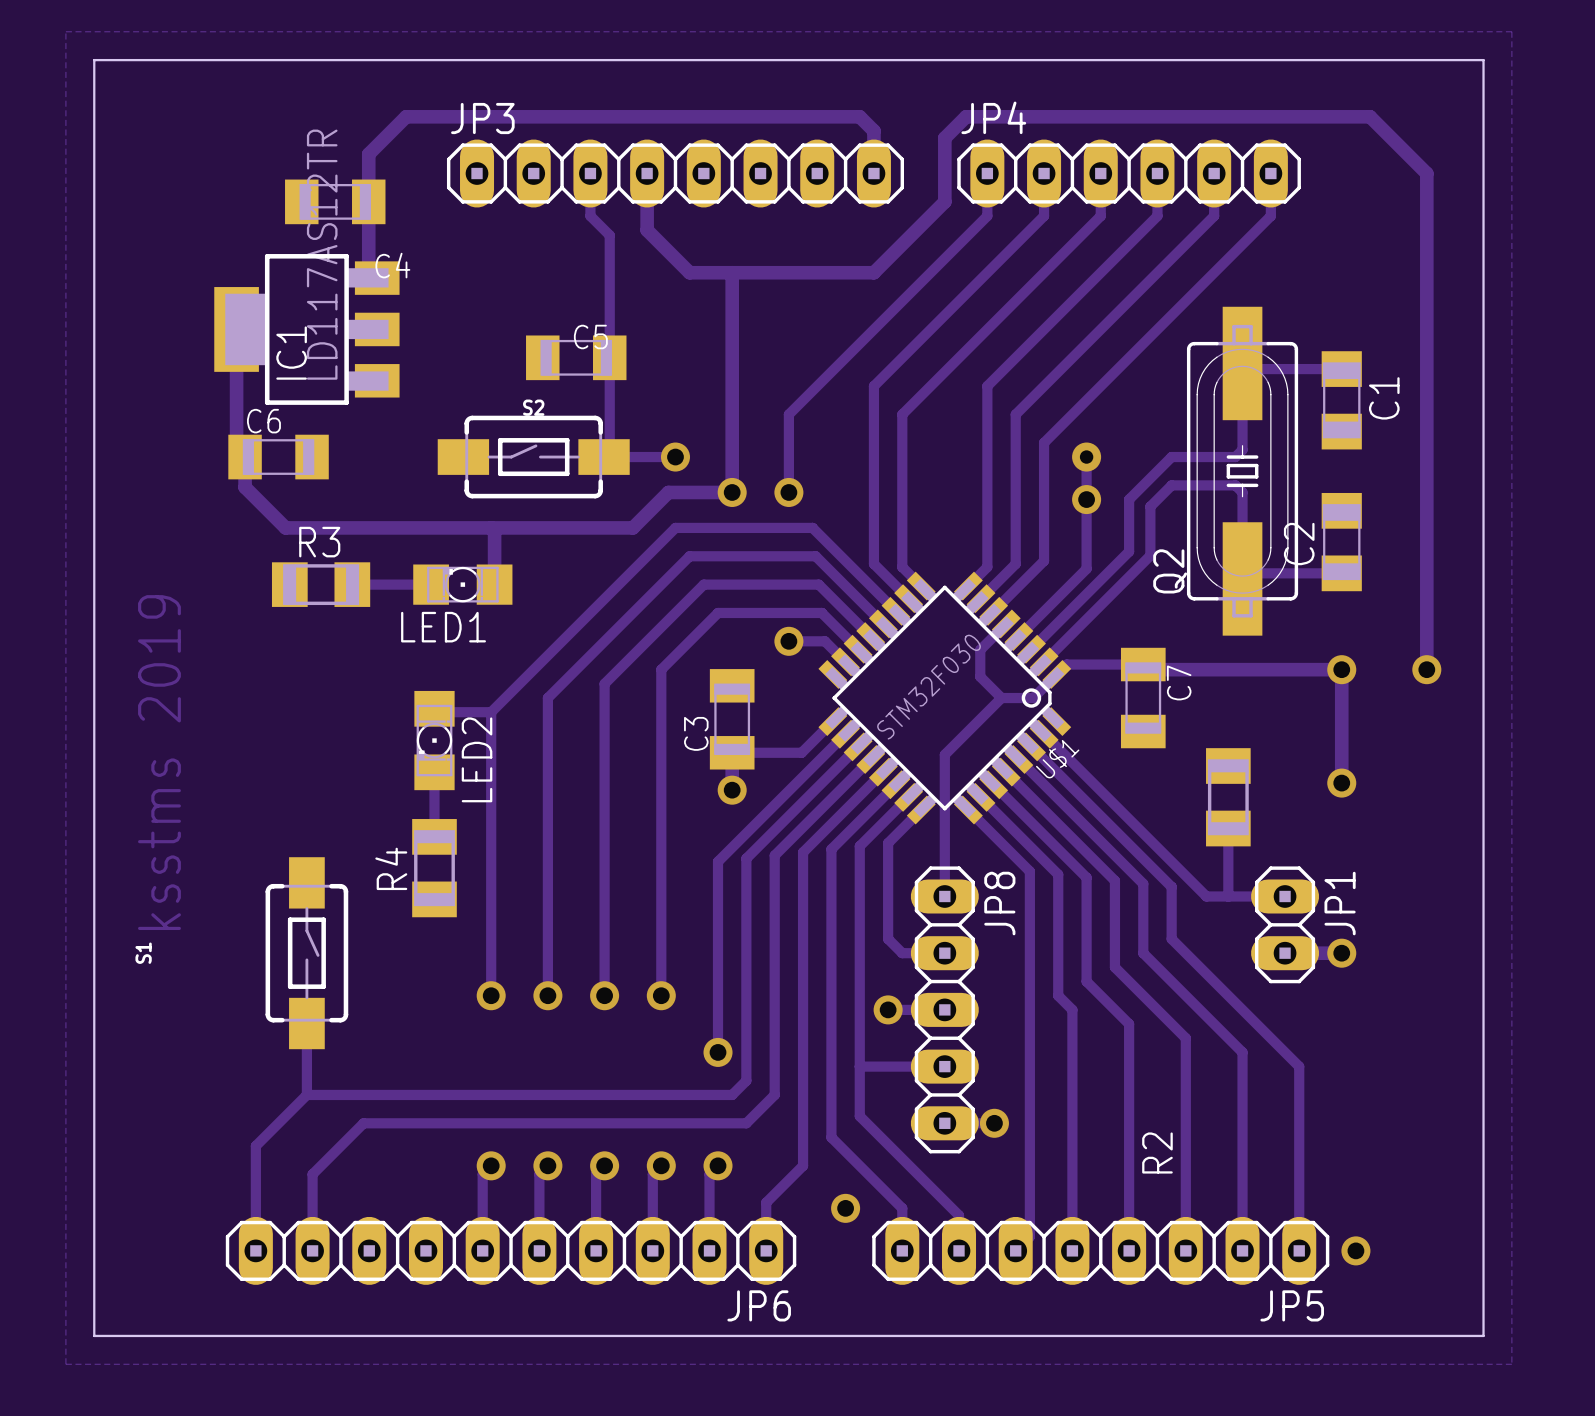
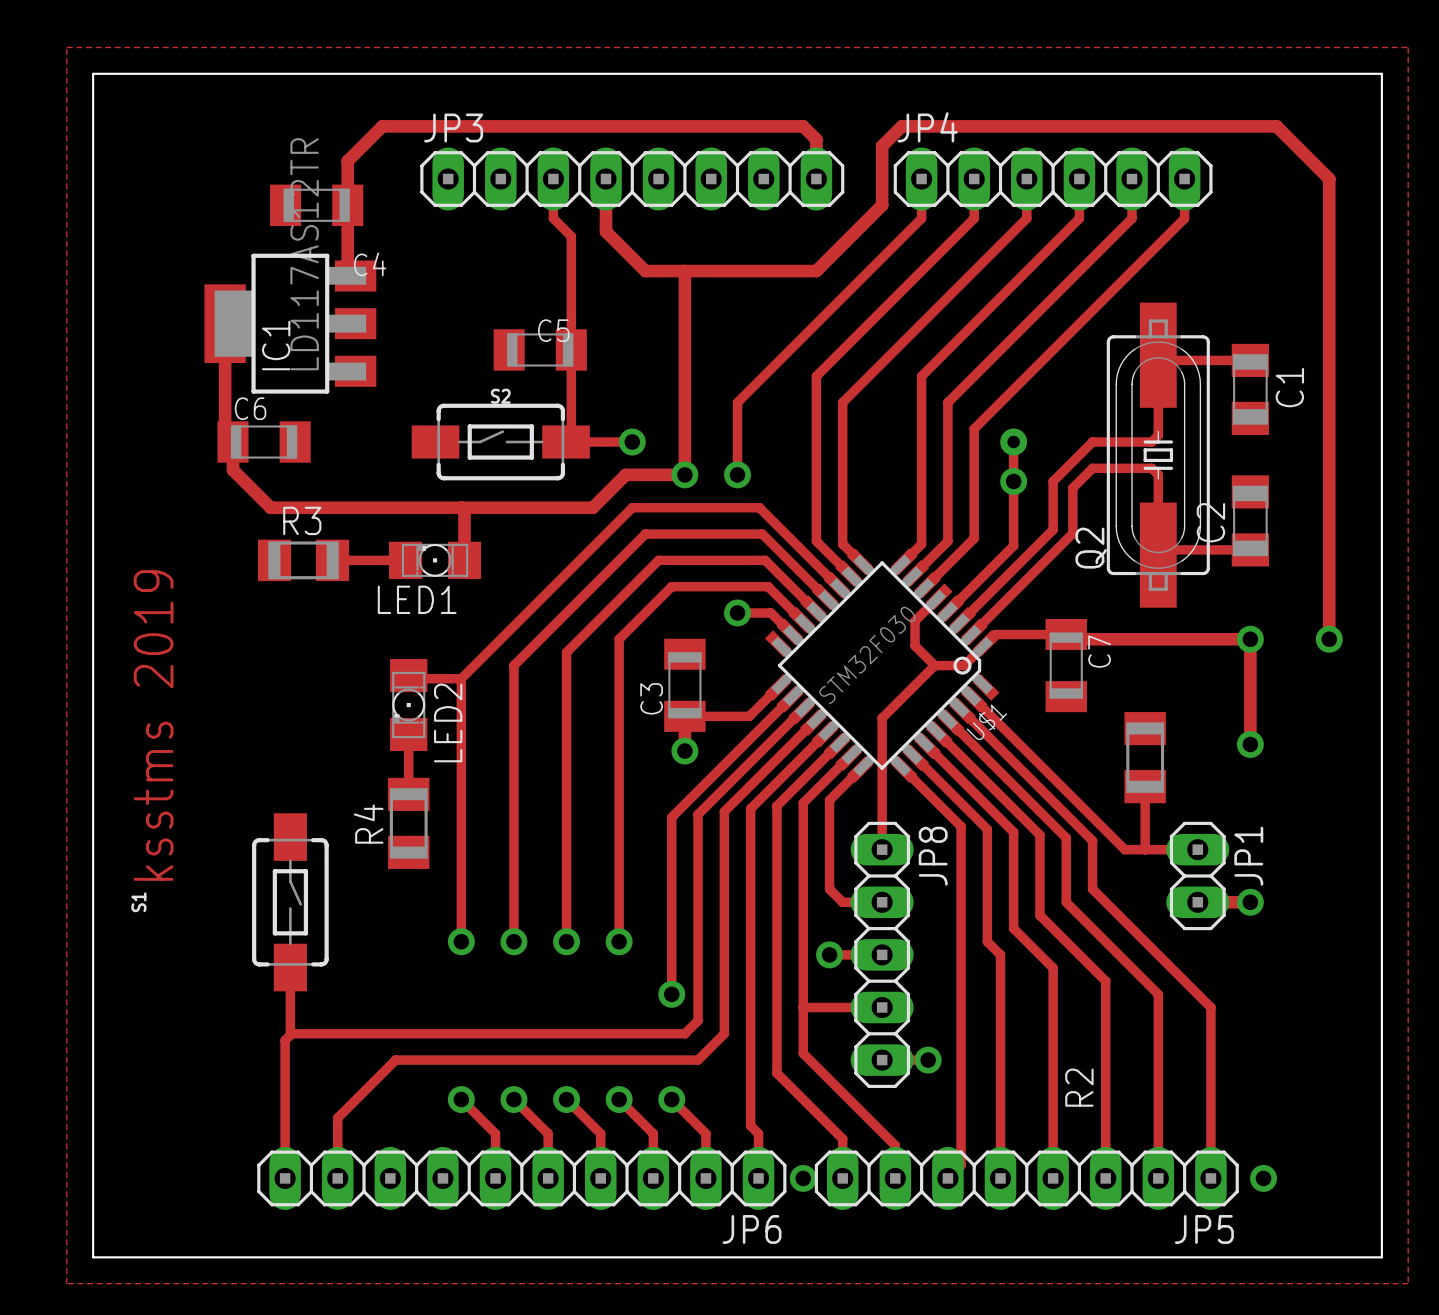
track: (306, 1094) (255, 1145) (255, 1250) -> (290, 1033) (285, 1040) (285, 1178)
track: (420, 1123) (363, 1123) (312, 1174) (312, 1250) -> (395, 1060) (337, 1117) (337, 1178)
track: (491, 1165) (482, 1174) (482, 1250) -> (461, 1099) (495, 1133) (495, 1178)
track: (547, 1165) (539, 1174) (539, 1250) -> (513, 1099) (548, 1133) (548, 1178)
track: (604, 1165) (596, 1174) (596, 1250) -> (566, 1099) (600, 1133) (600, 1178)
track: (661, 1165) (652, 1174) (652, 1250) -> (619, 1099) (653, 1133) (653, 1178)
track: (718, 1165) (709, 1174) (709, 1250) -> (671, 1099) (705, 1133) (705, 1178)
track: (803, 1165) (766, 1202) (766, 1250) -> (750, 1099) (750, 1125) (758, 1133) (758, 1178)
via position: (845, 1208) -> (803, 1178)
JP6 position: (511, 1250) -> (521, 1178)

